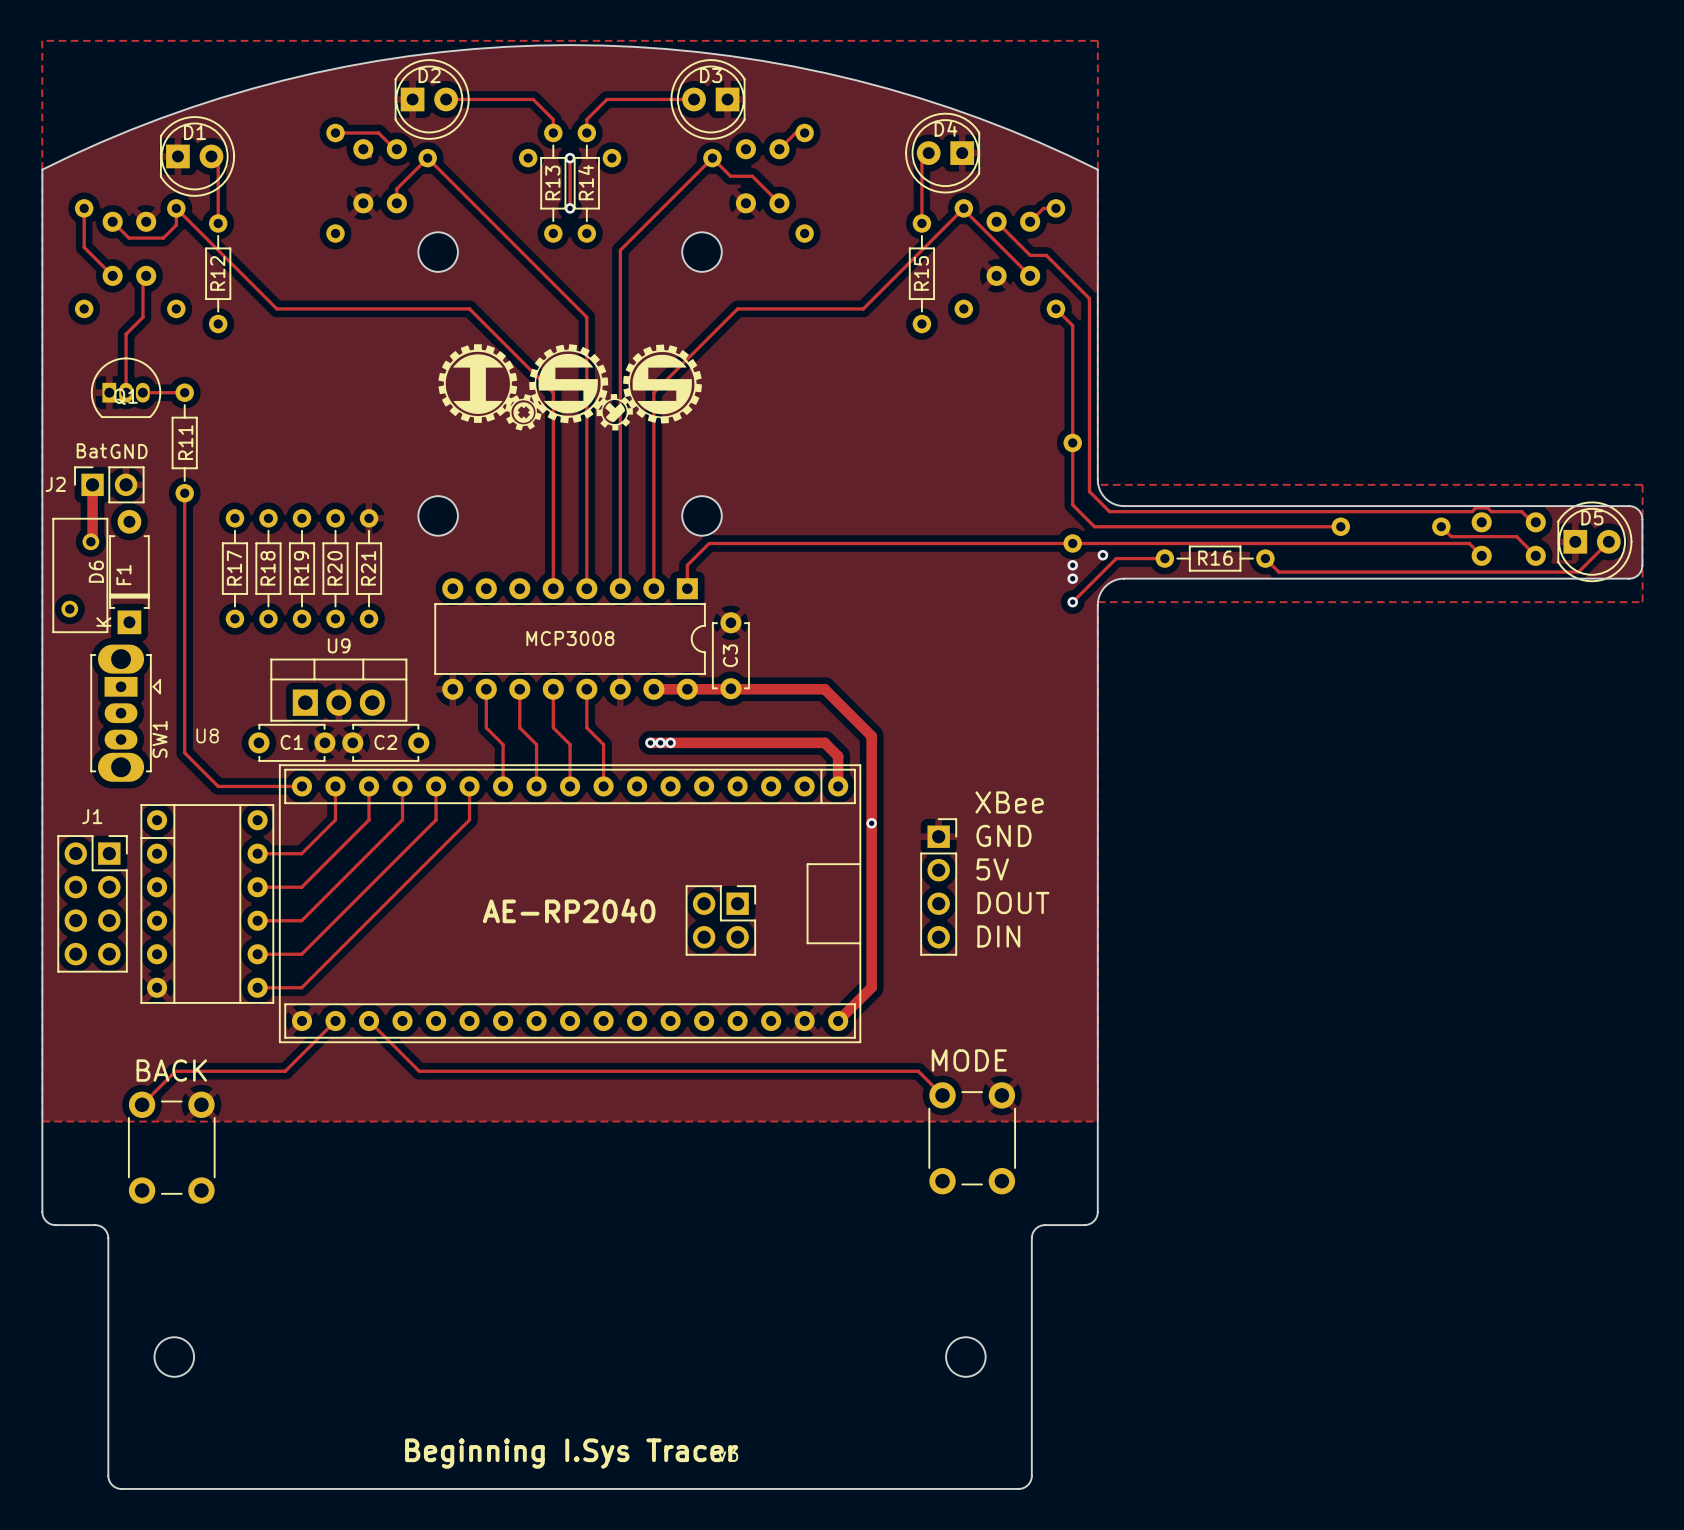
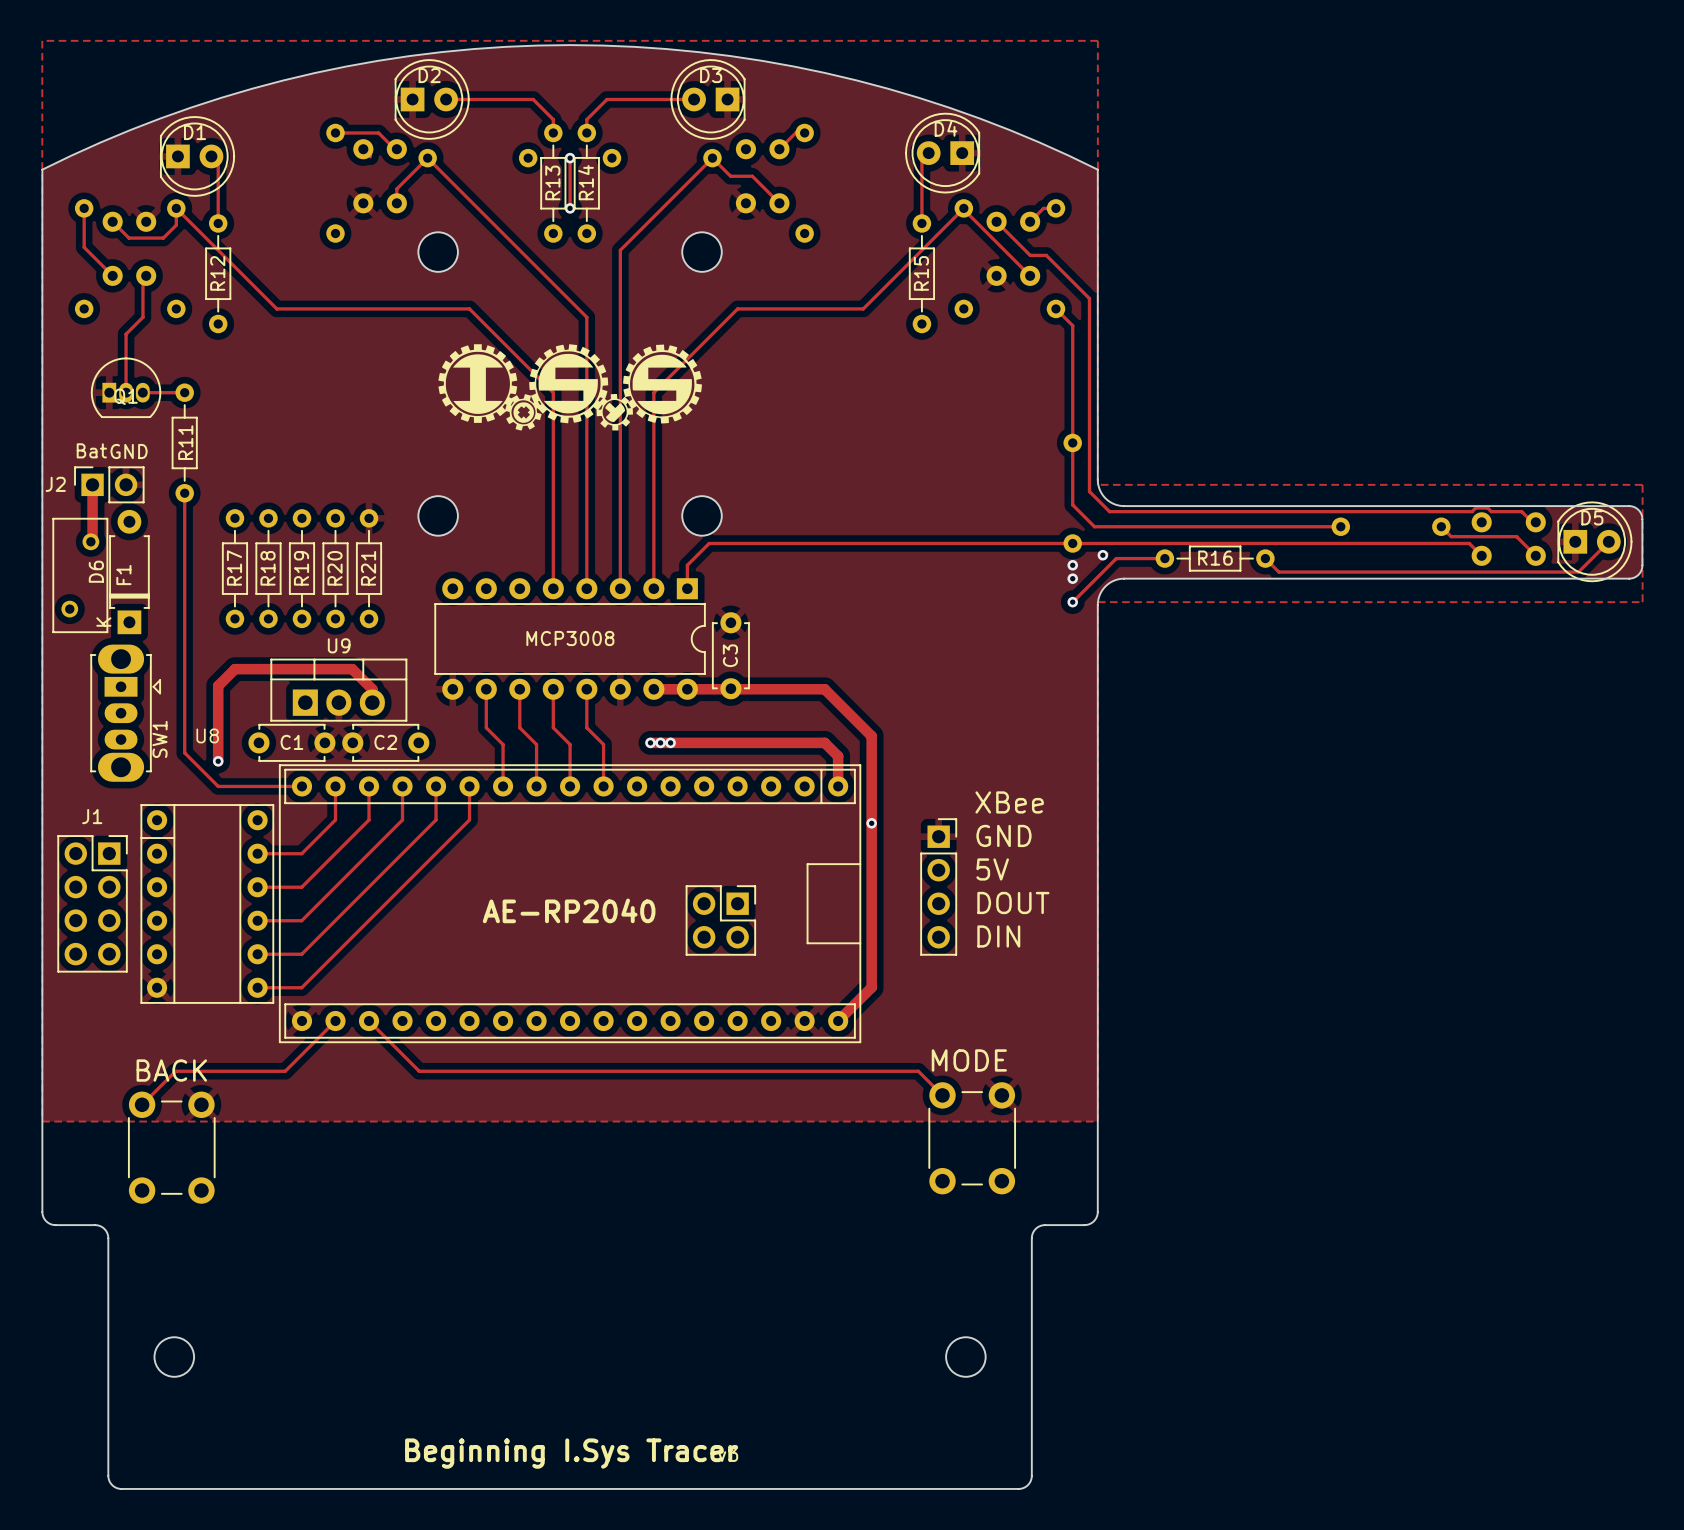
track: none -> (372, 702) (372, 689) (352, 669) (234, 669) (218, 685) (218, 761)
via: none -> (218, 761)

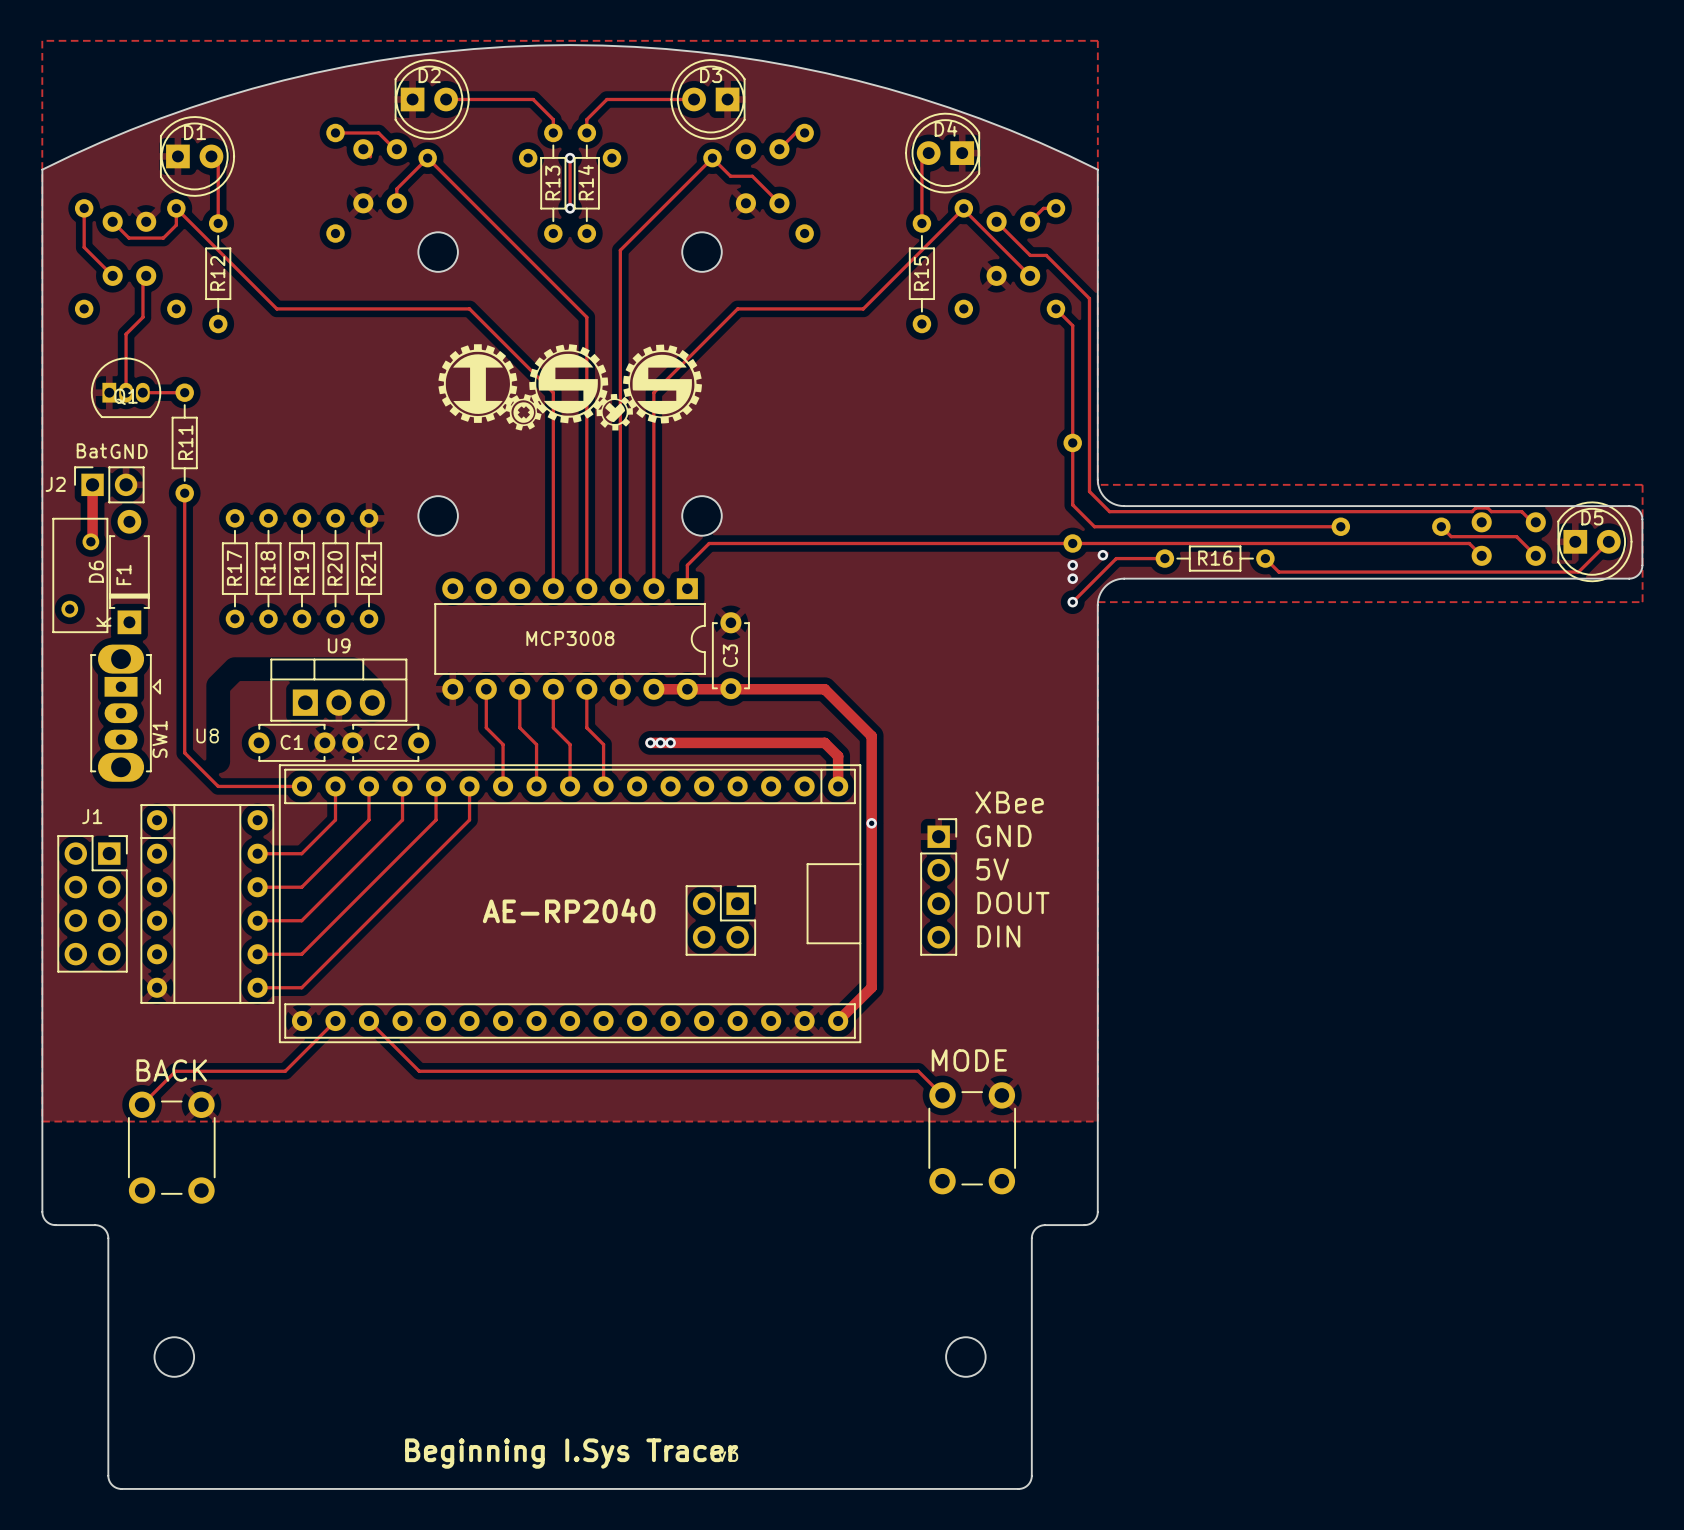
track: (372, 702) (372, 689) (352, 669) (234, 669) (218, 685) (218, 761) -> none
via: (218, 761) -> none

